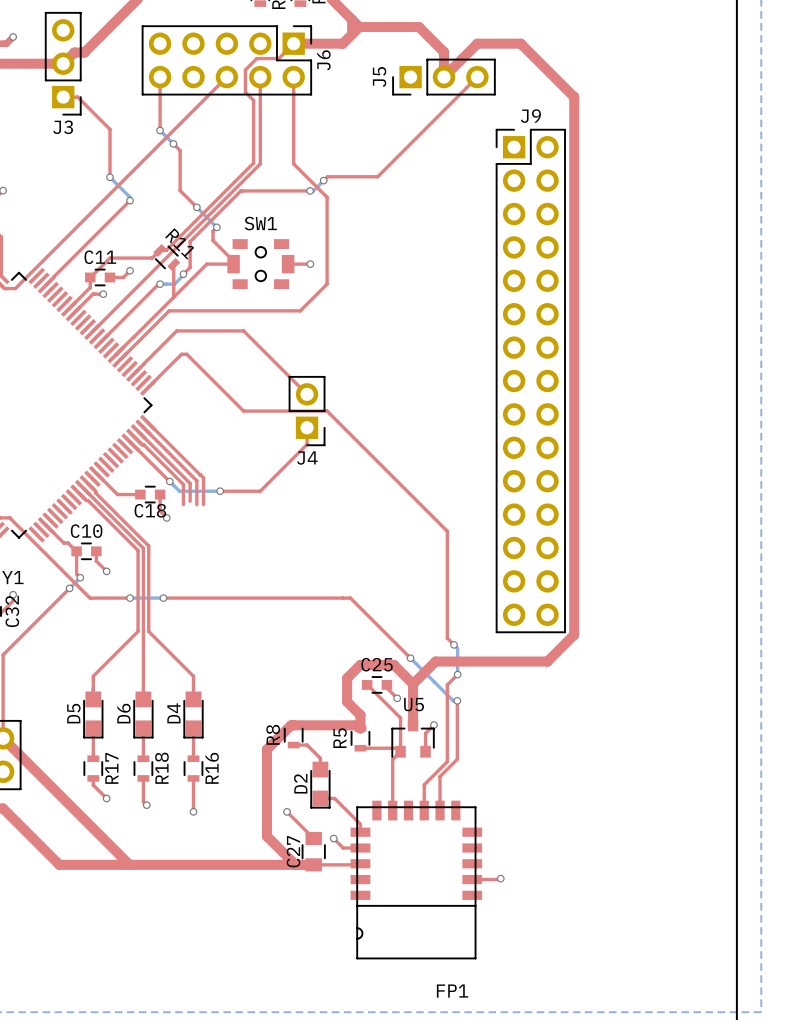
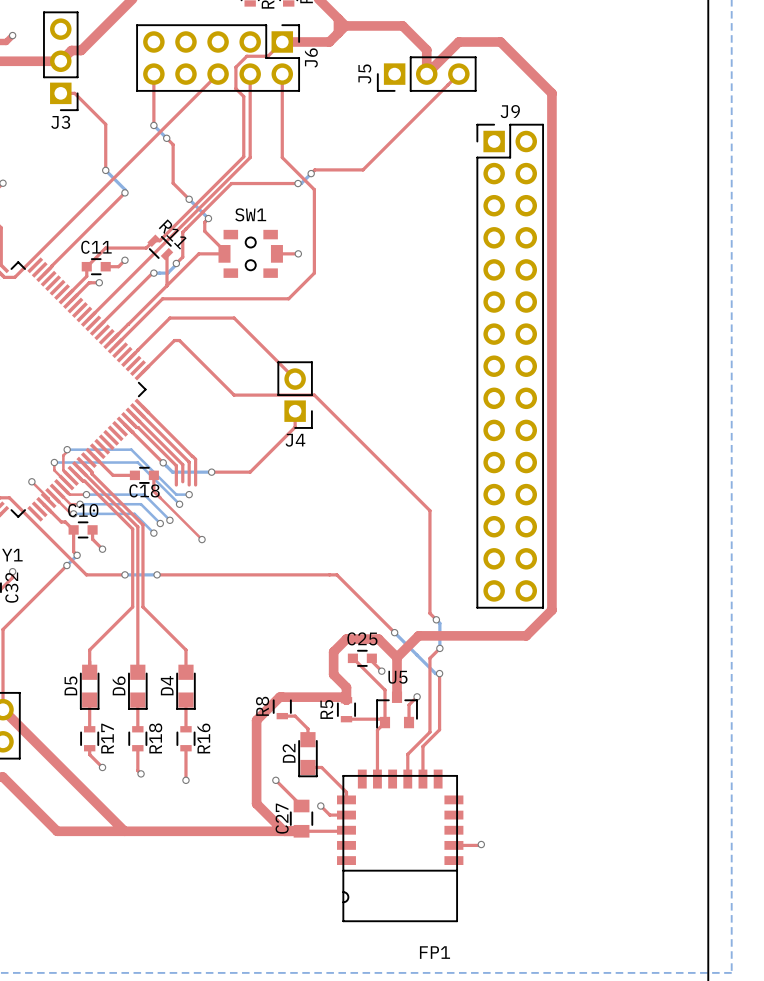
top track: none -> (67, 449) (63, 455) (63, 470) (70, 478)
bottom track: none -> (67, 449) (131, 449) (176, 494) (189, 494)
via: none -> (67, 449)
top track: none -> (54, 462) (54, 470) (66, 482)
bottom track: none -> (54, 462) (137, 462) (179, 504)
via: none -> (54, 462)
top track: none -> (31, 481) (48, 500)
via: none -> (31, 481)
top track: none -> (62, 486) (69, 494) (86, 494)
top track: none -> (57, 491) (70, 504) (80, 504)
bottom track: none -> (86, 494) (144, 494) (169, 520)
via: none -> (86, 494)
via: none -> (189, 494)
top track: none -> (53, 495) (71, 513) (73, 513)
top track: none -> (160, 497) (202, 539)
via: (166, 517) -> none
bottom track: none -> (80, 504) (141, 504) (160, 523)
via: none -> (80, 504)
via: none -> (179, 504)
bottom track: none -> (73, 513) (134, 513) (153, 533)
via: none -> (73, 513)
via: none -> (169, 520)
via: none -> (160, 523)
via: none -> (153, 533)
via: none -> (202, 539)

